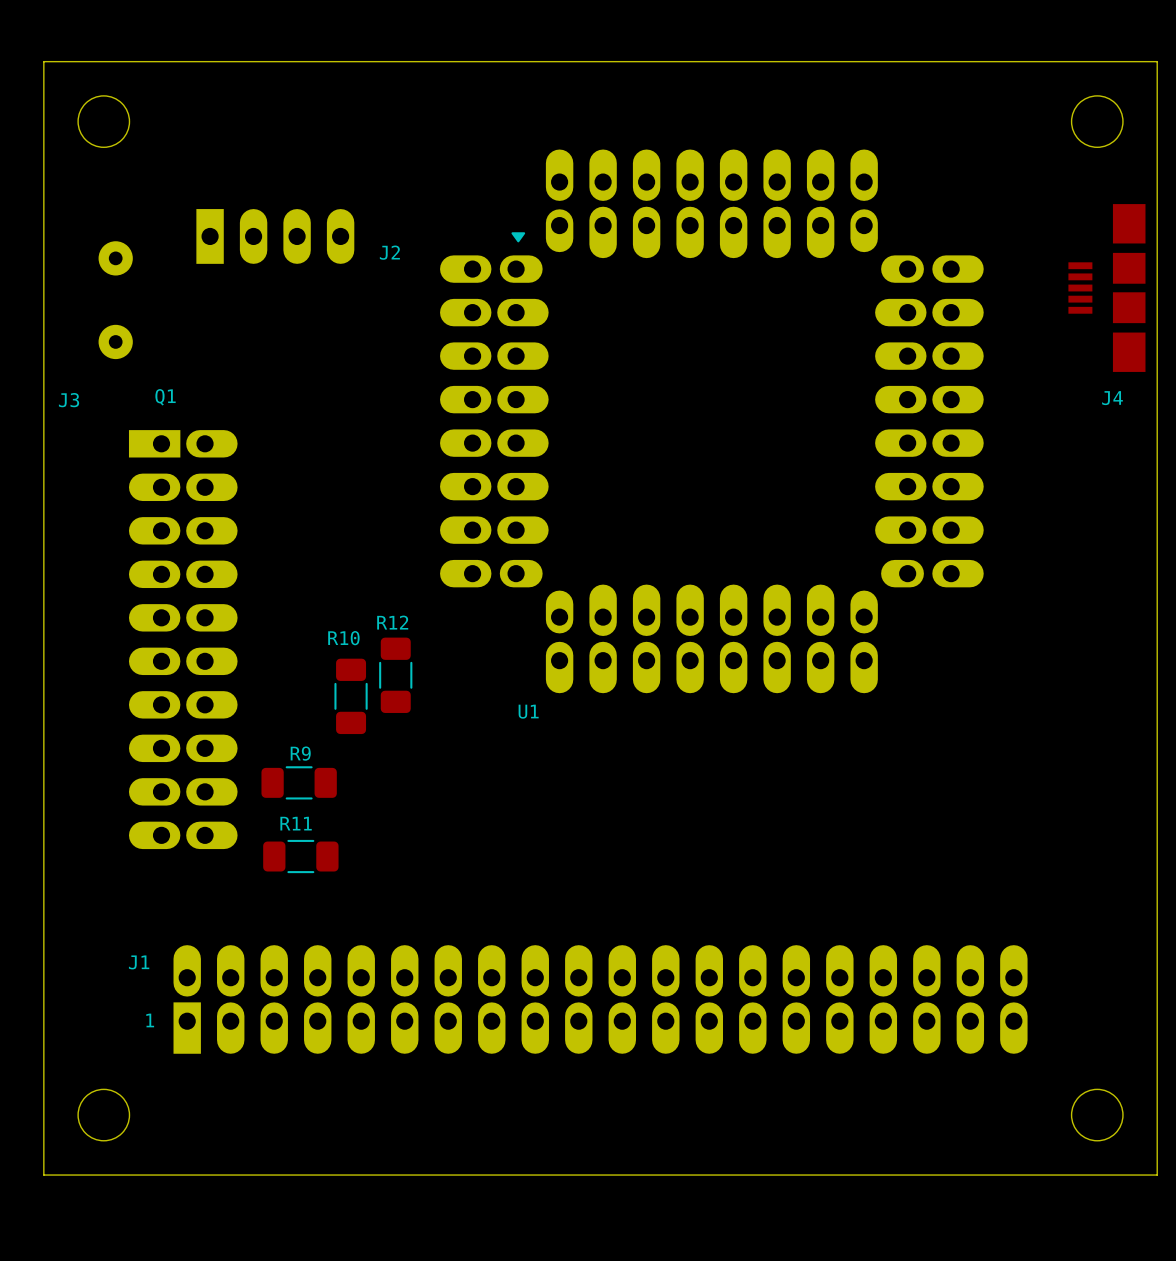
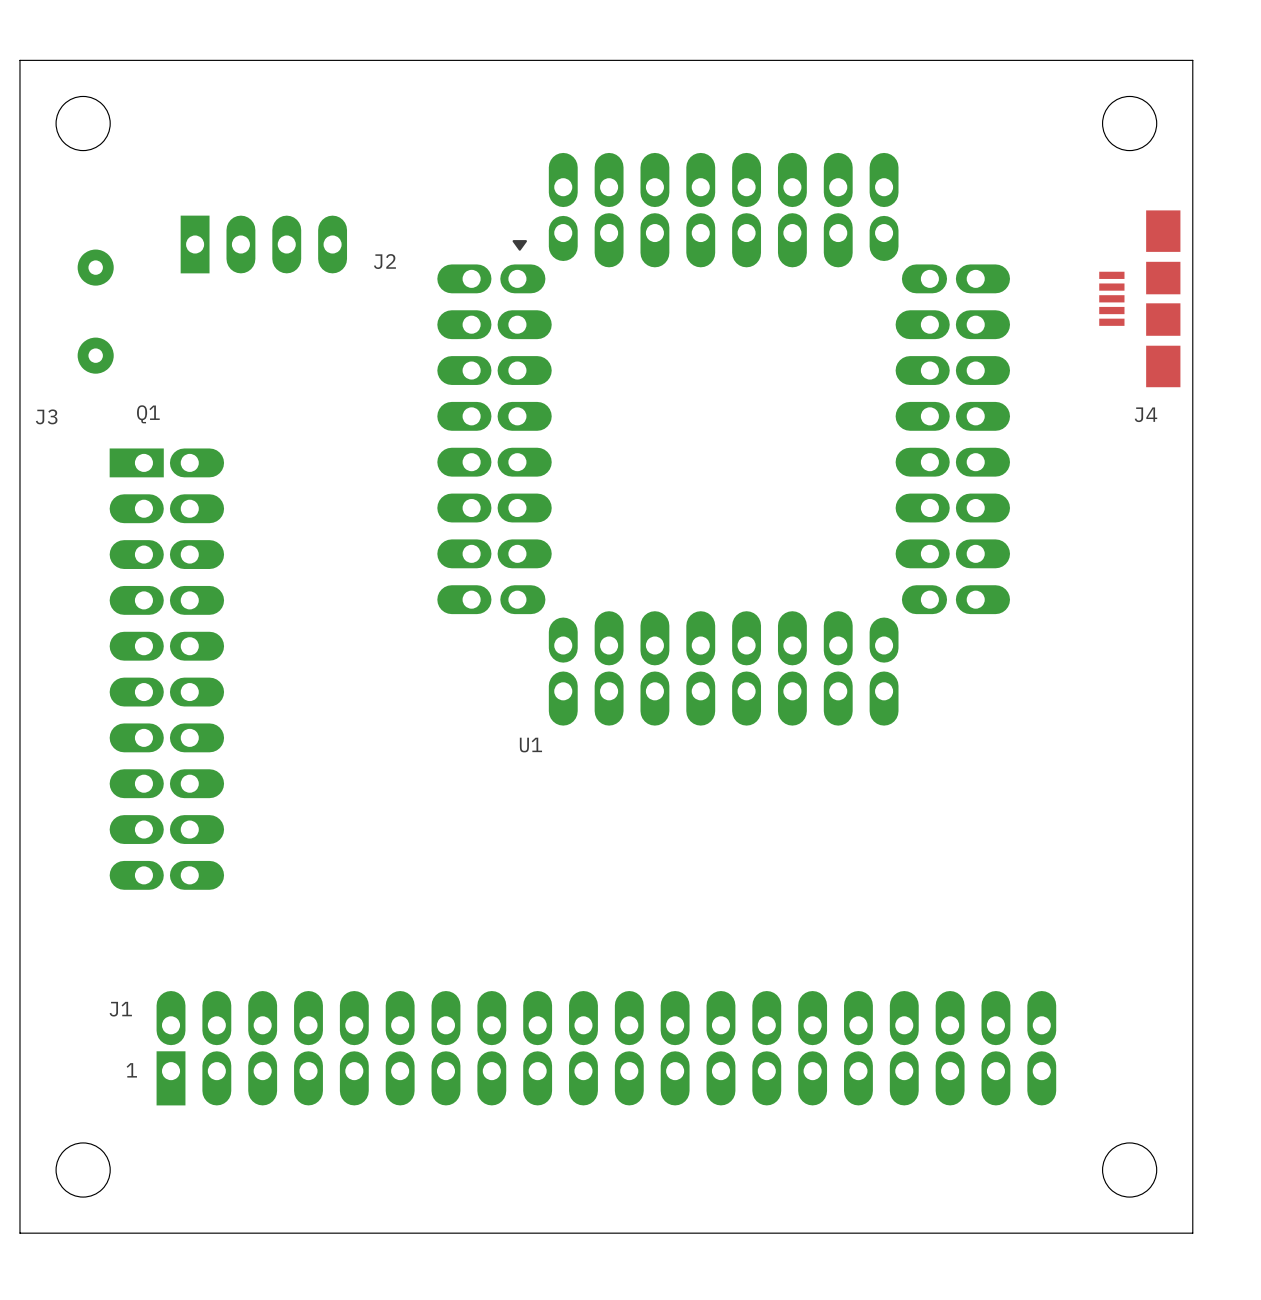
R12: (395, 675) -> none
R10: (351, 696) -> none
R9: (299, 782) -> none
R11: (300, 856) -> none

